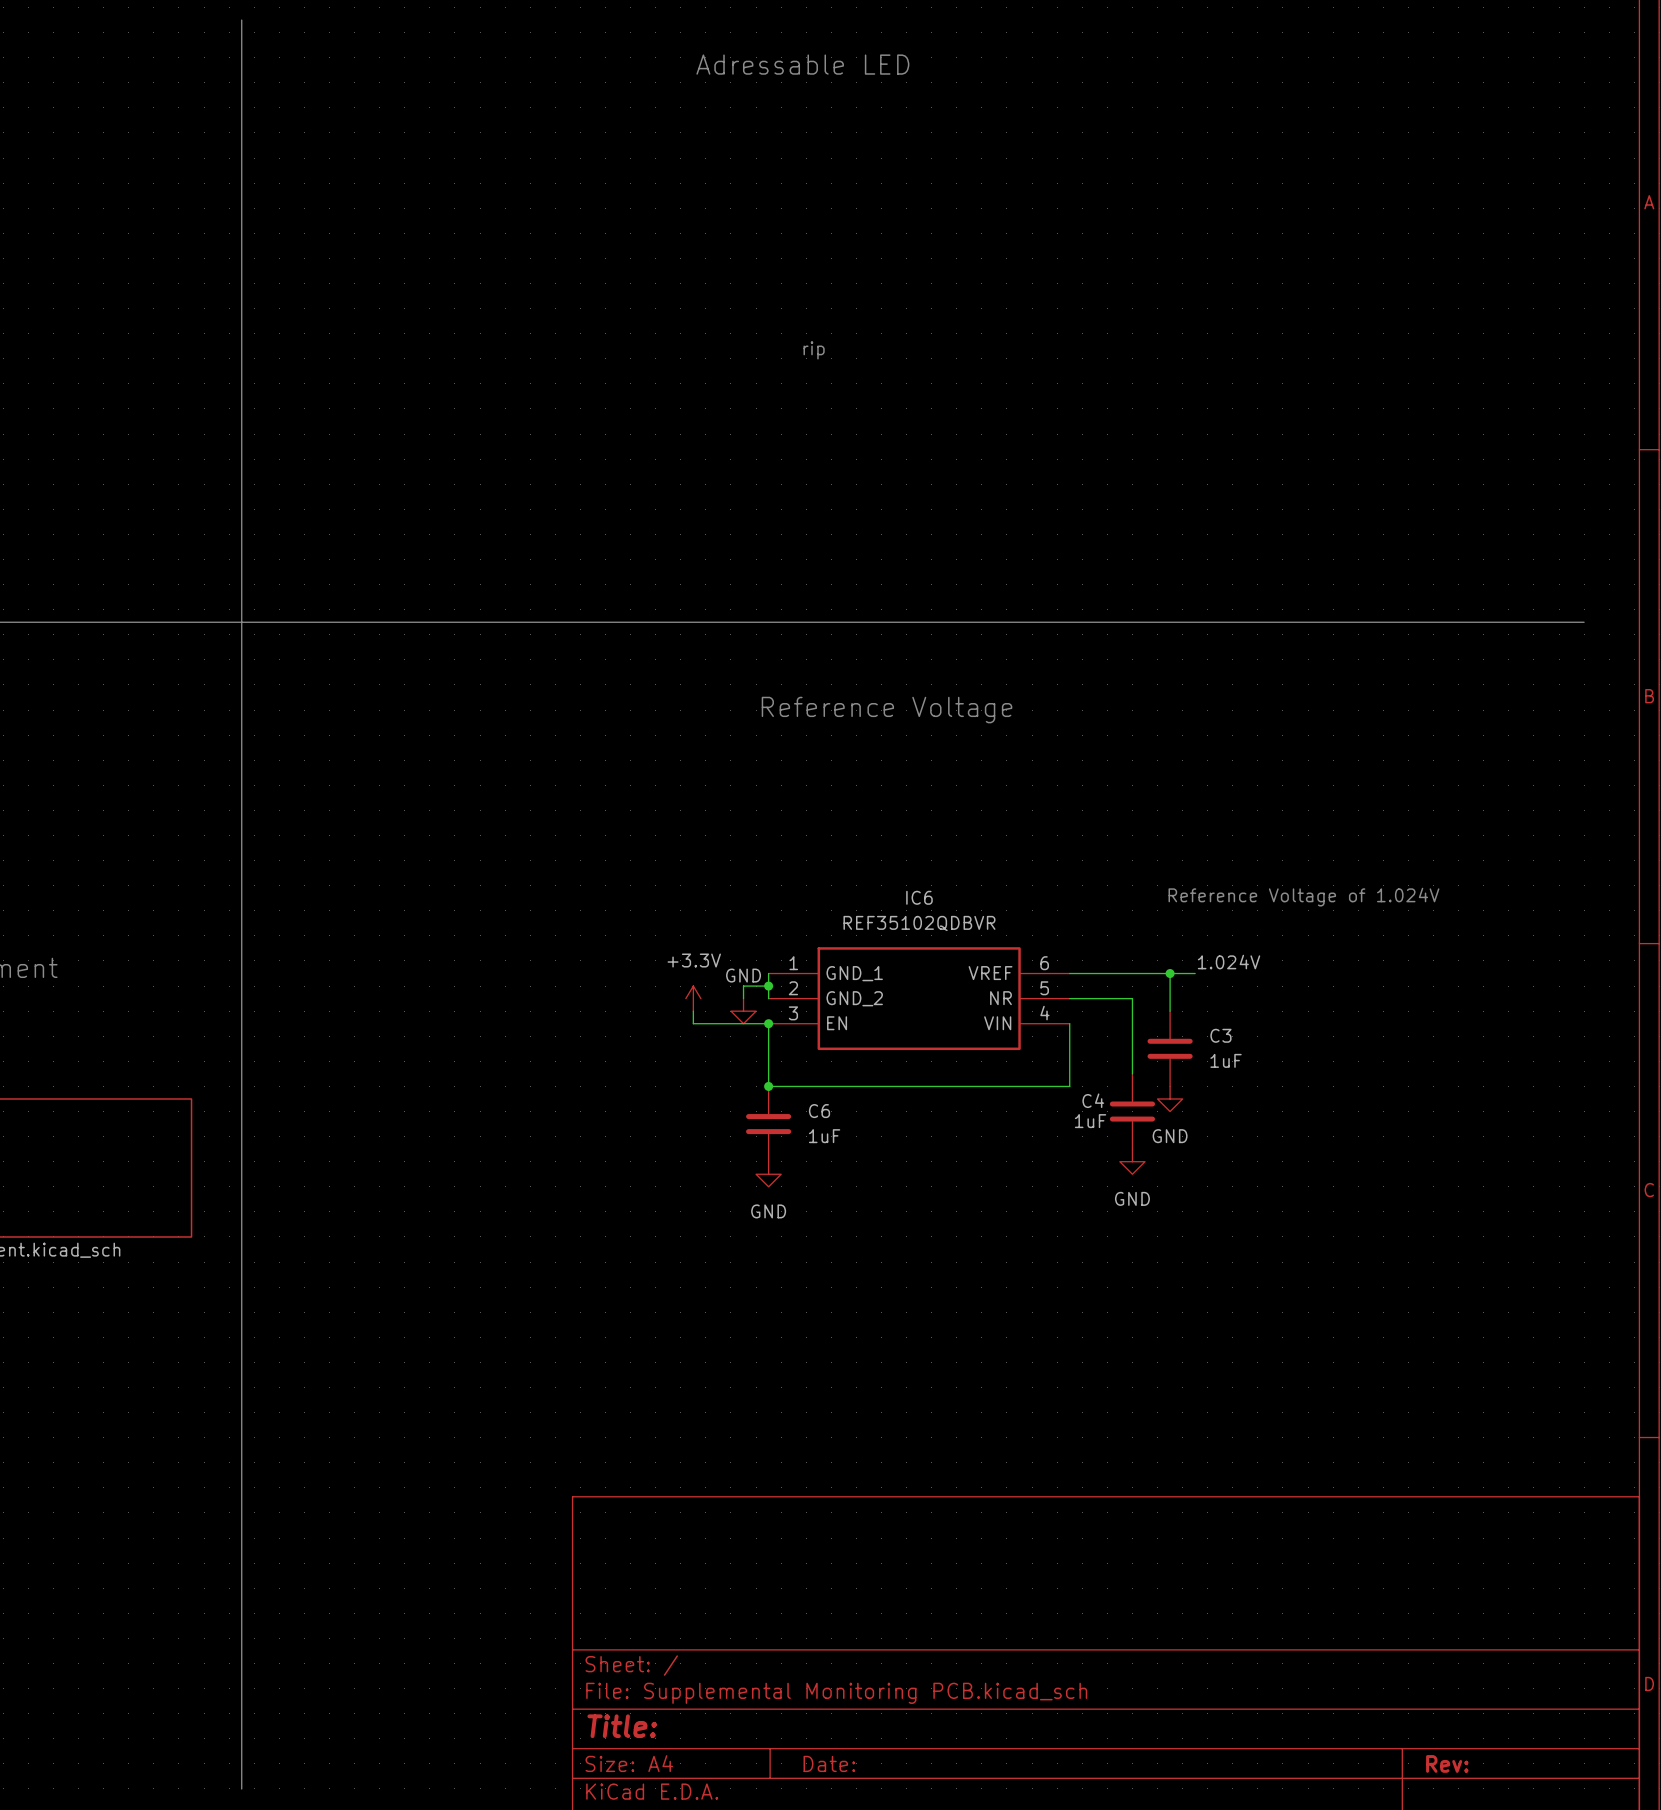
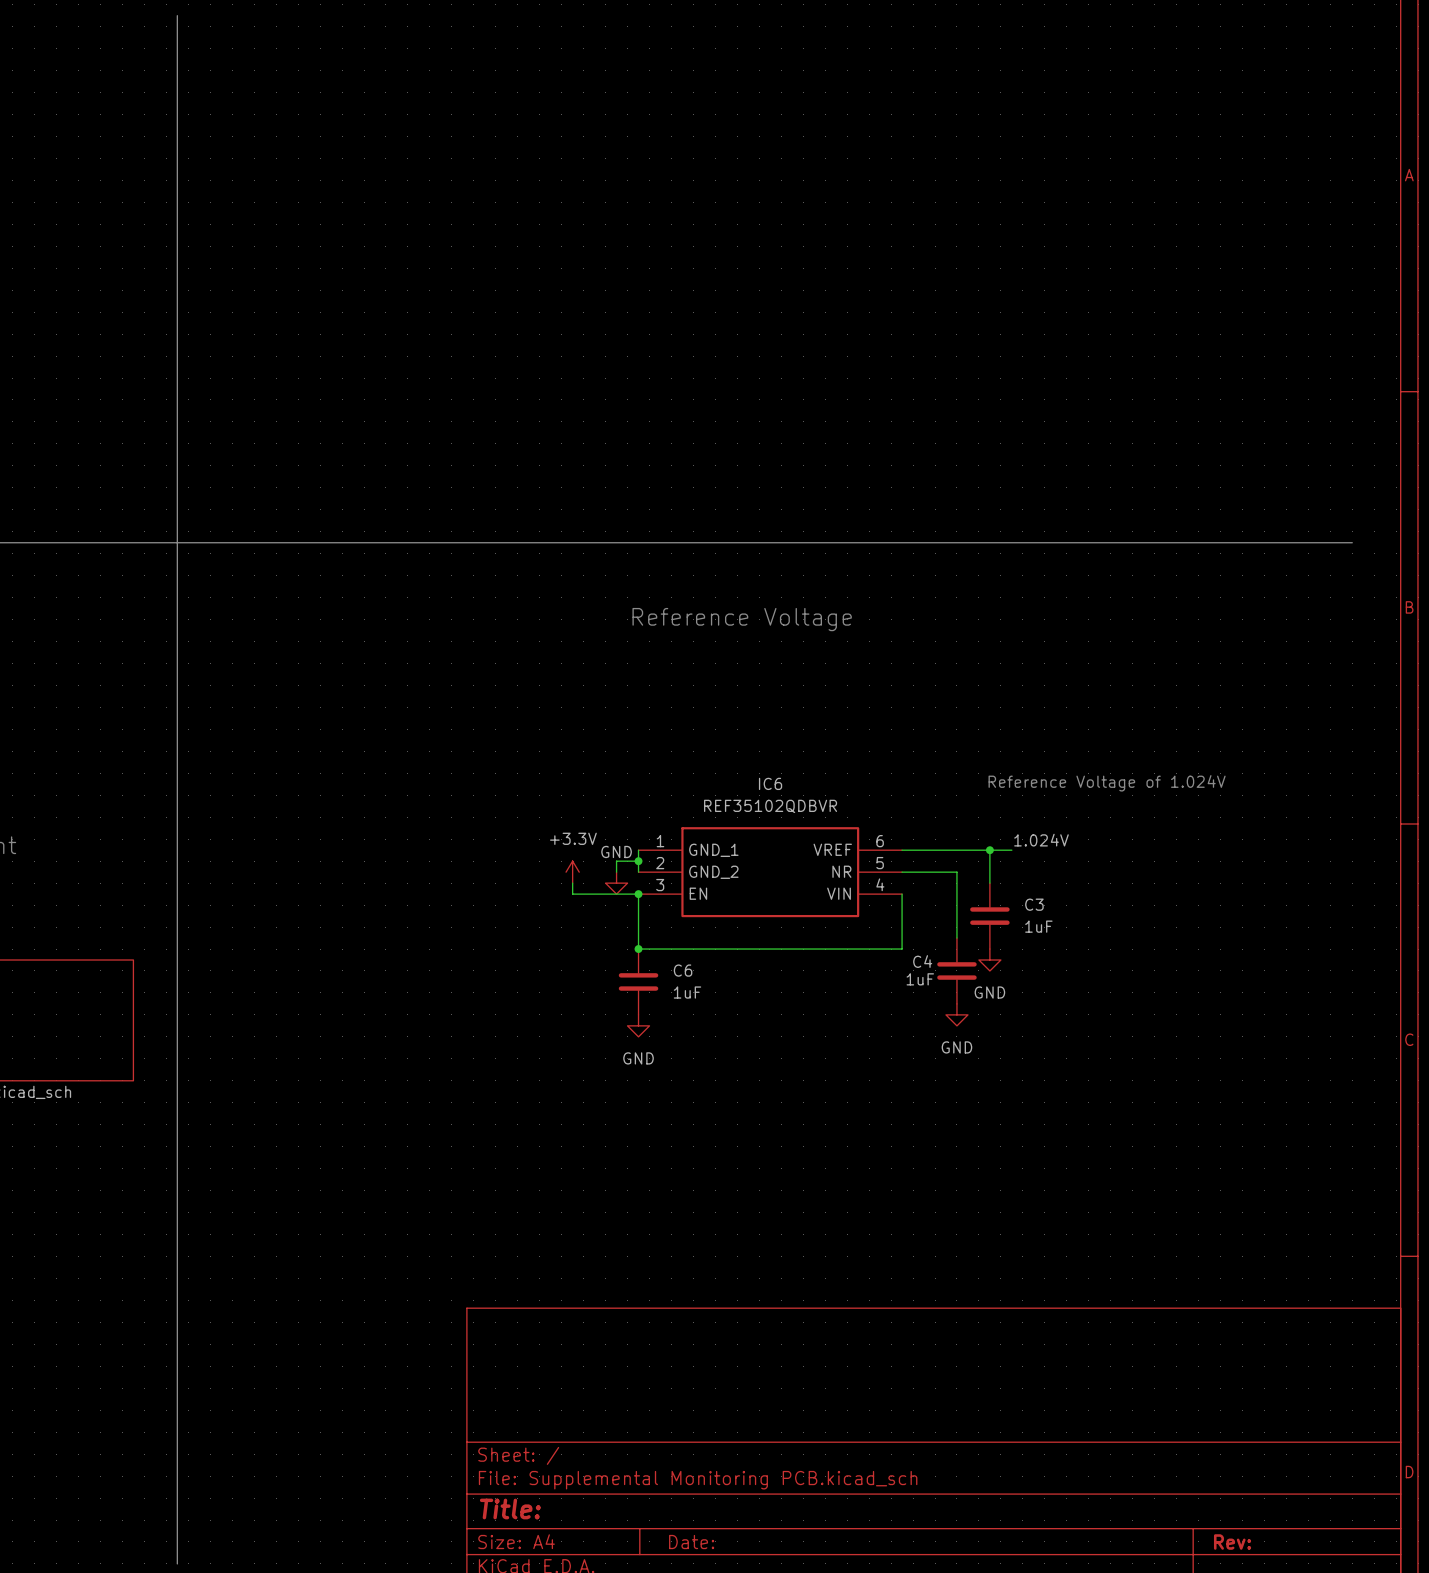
text: Adressable LED (802, 64) -> none
text: rip (814, 350) -> none

